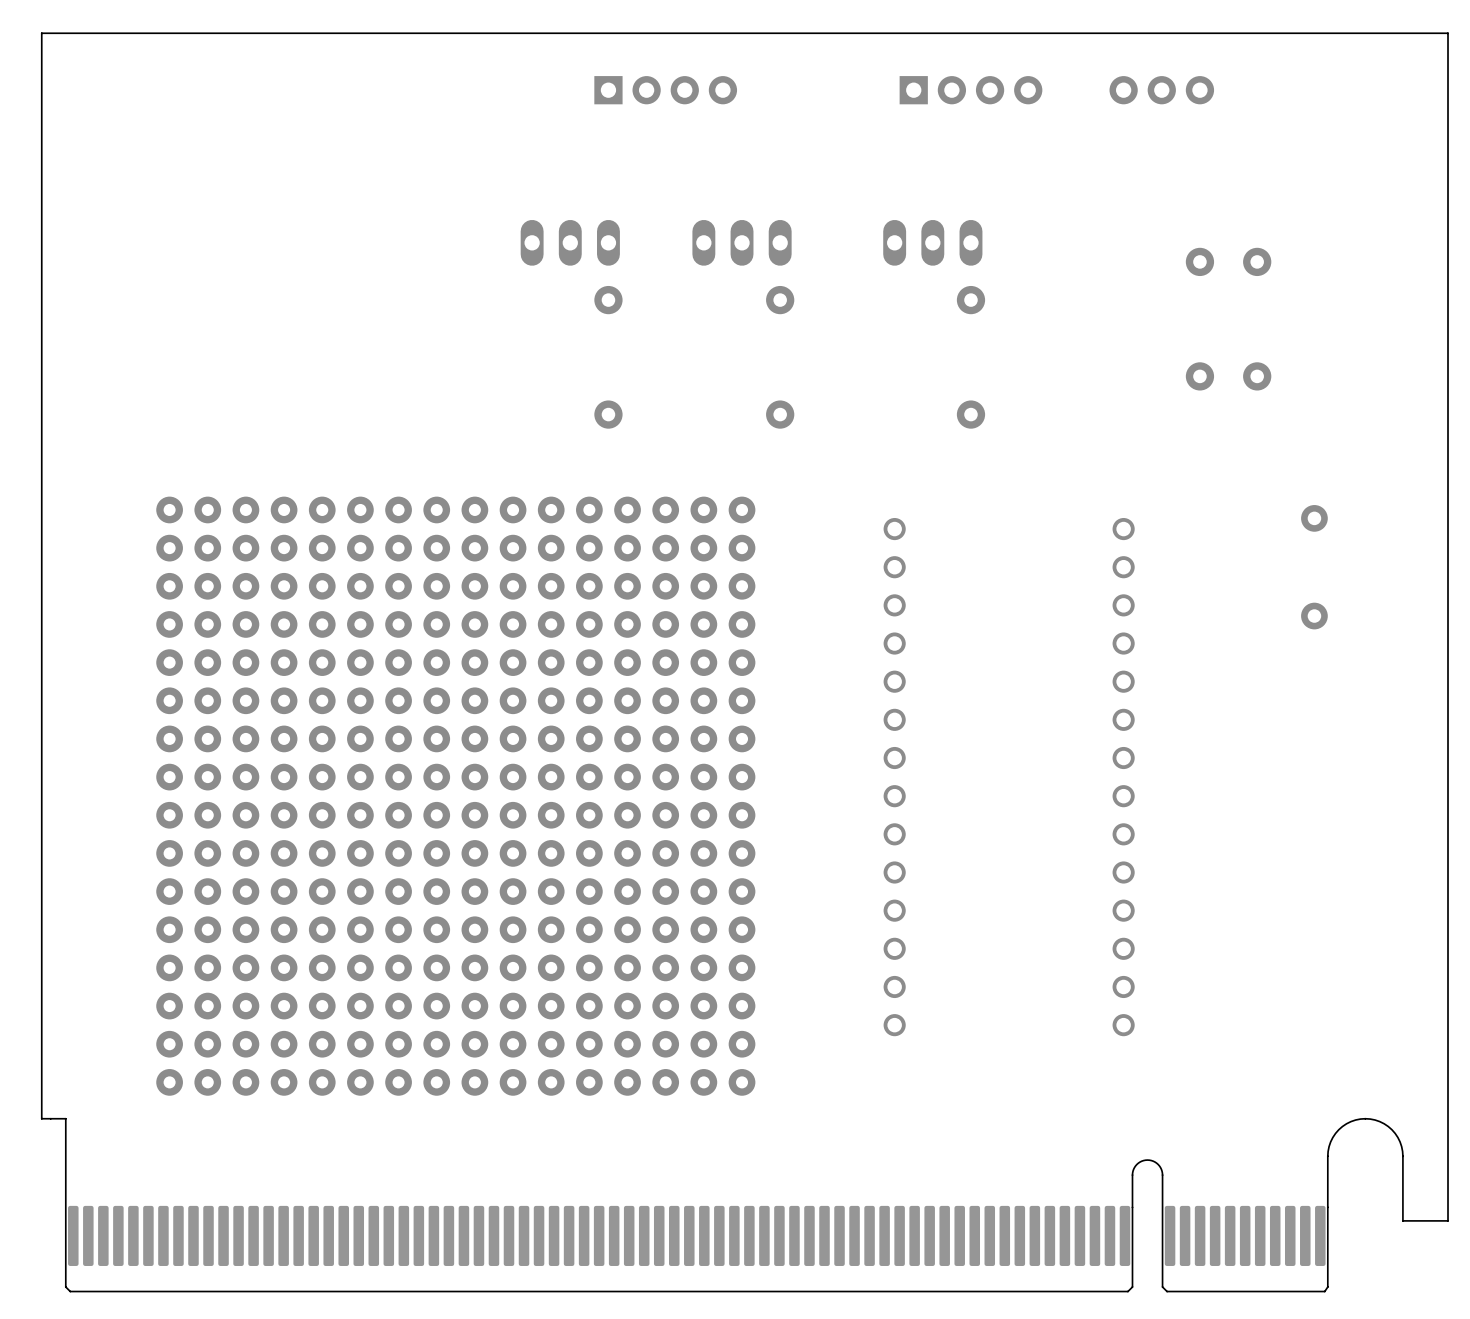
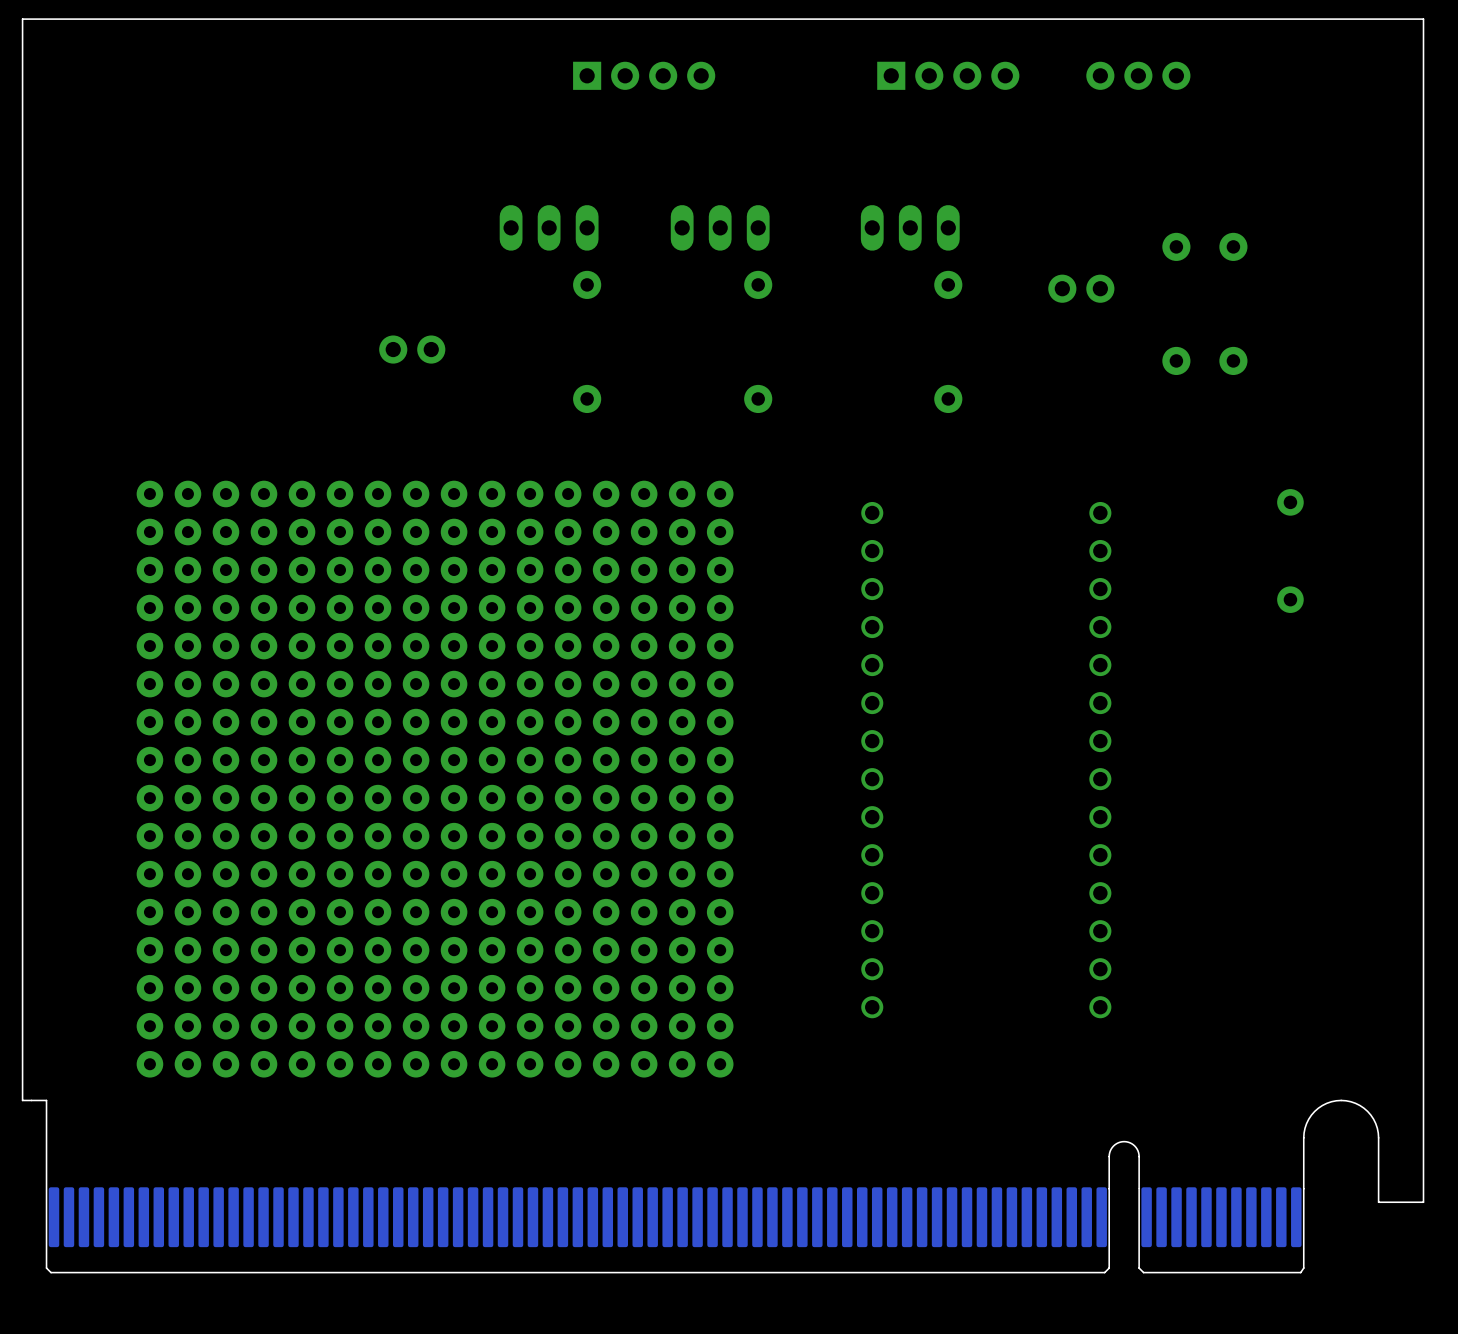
part: none -> (1081, 288)
part: none -> (412, 349)

